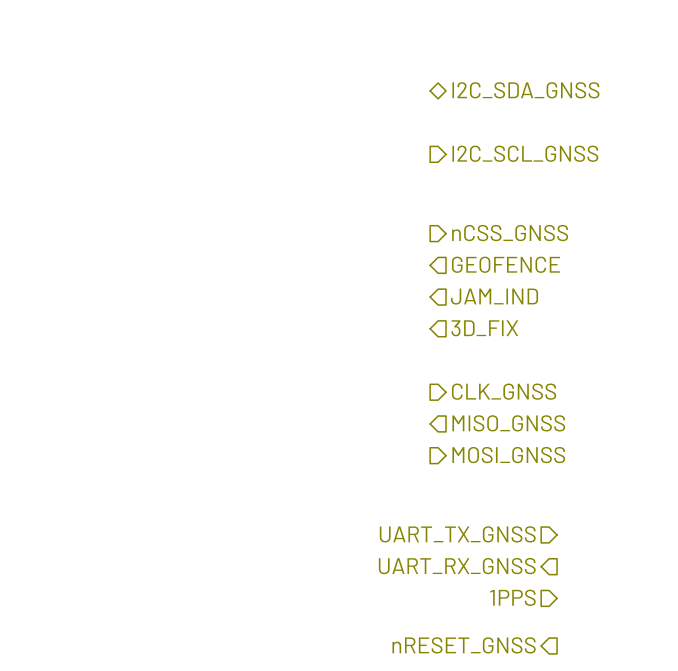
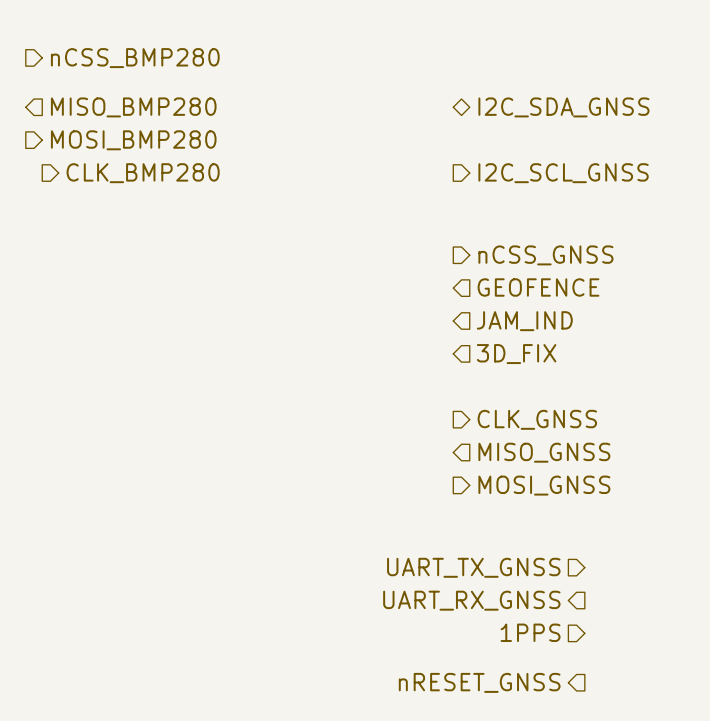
hierarchical label: none -> nCSS_BMP280 (135, 58)
hierarchical label: none -> MISO_BMP280 (133, 107)
hierarchical label: none -> MOSI_BMP280 (133, 140)
hierarchical label: none -> CLK_BMP280 (143, 173)

